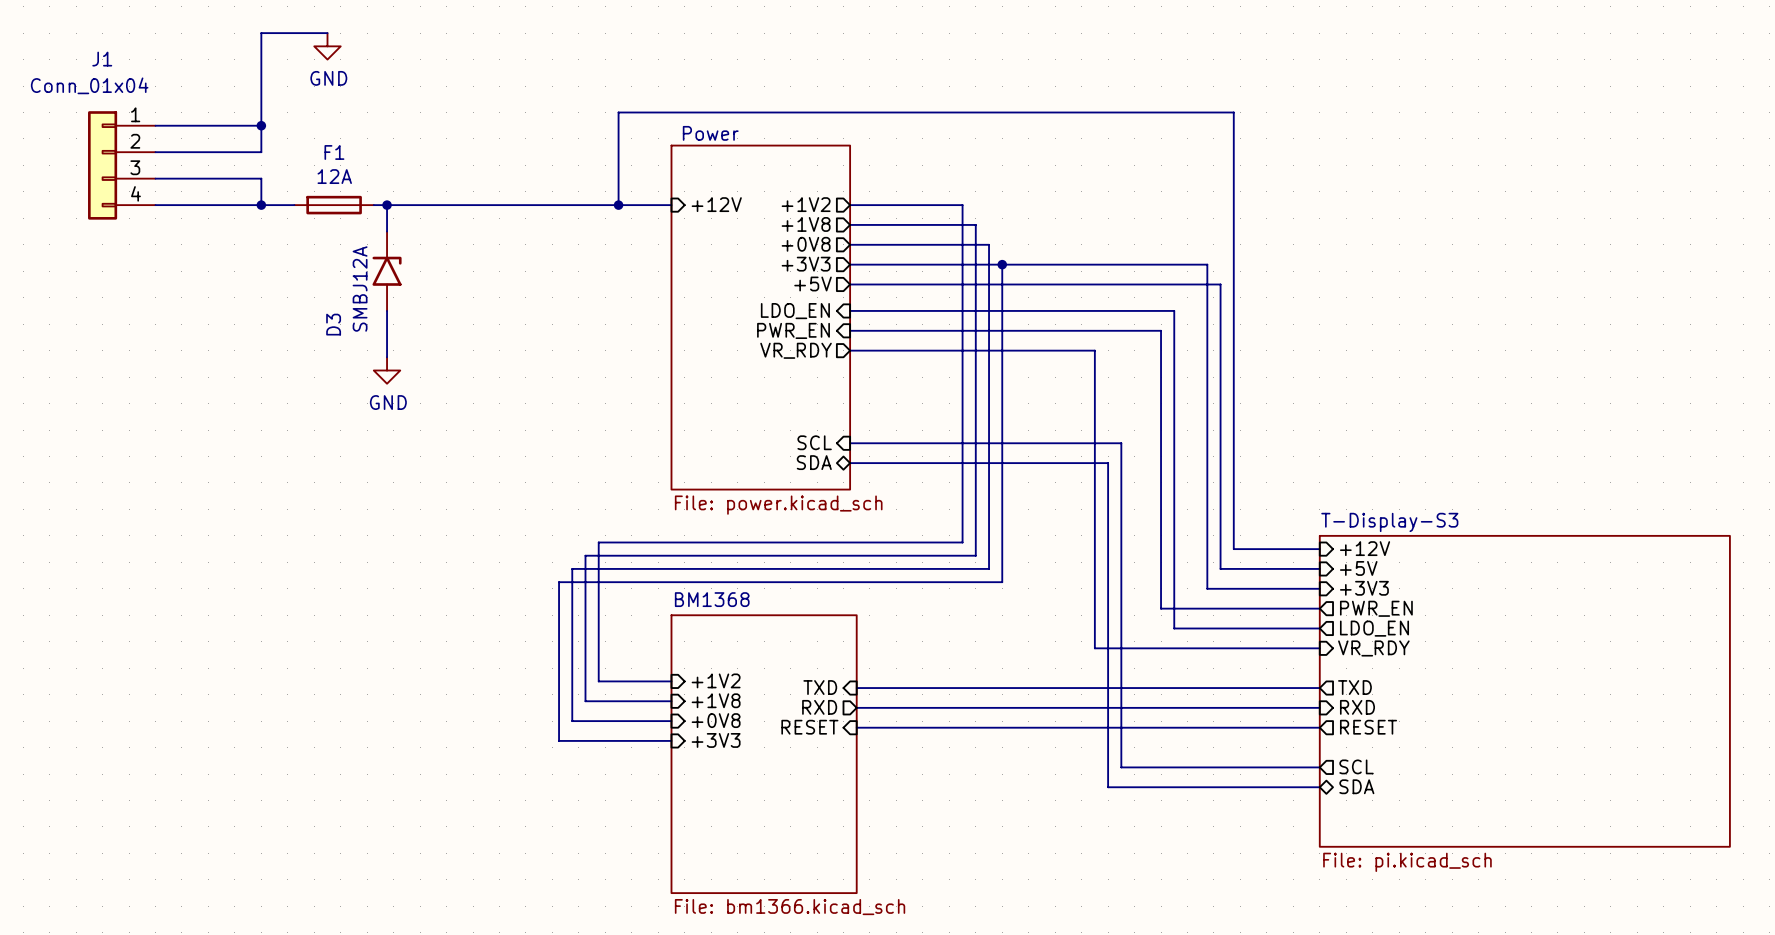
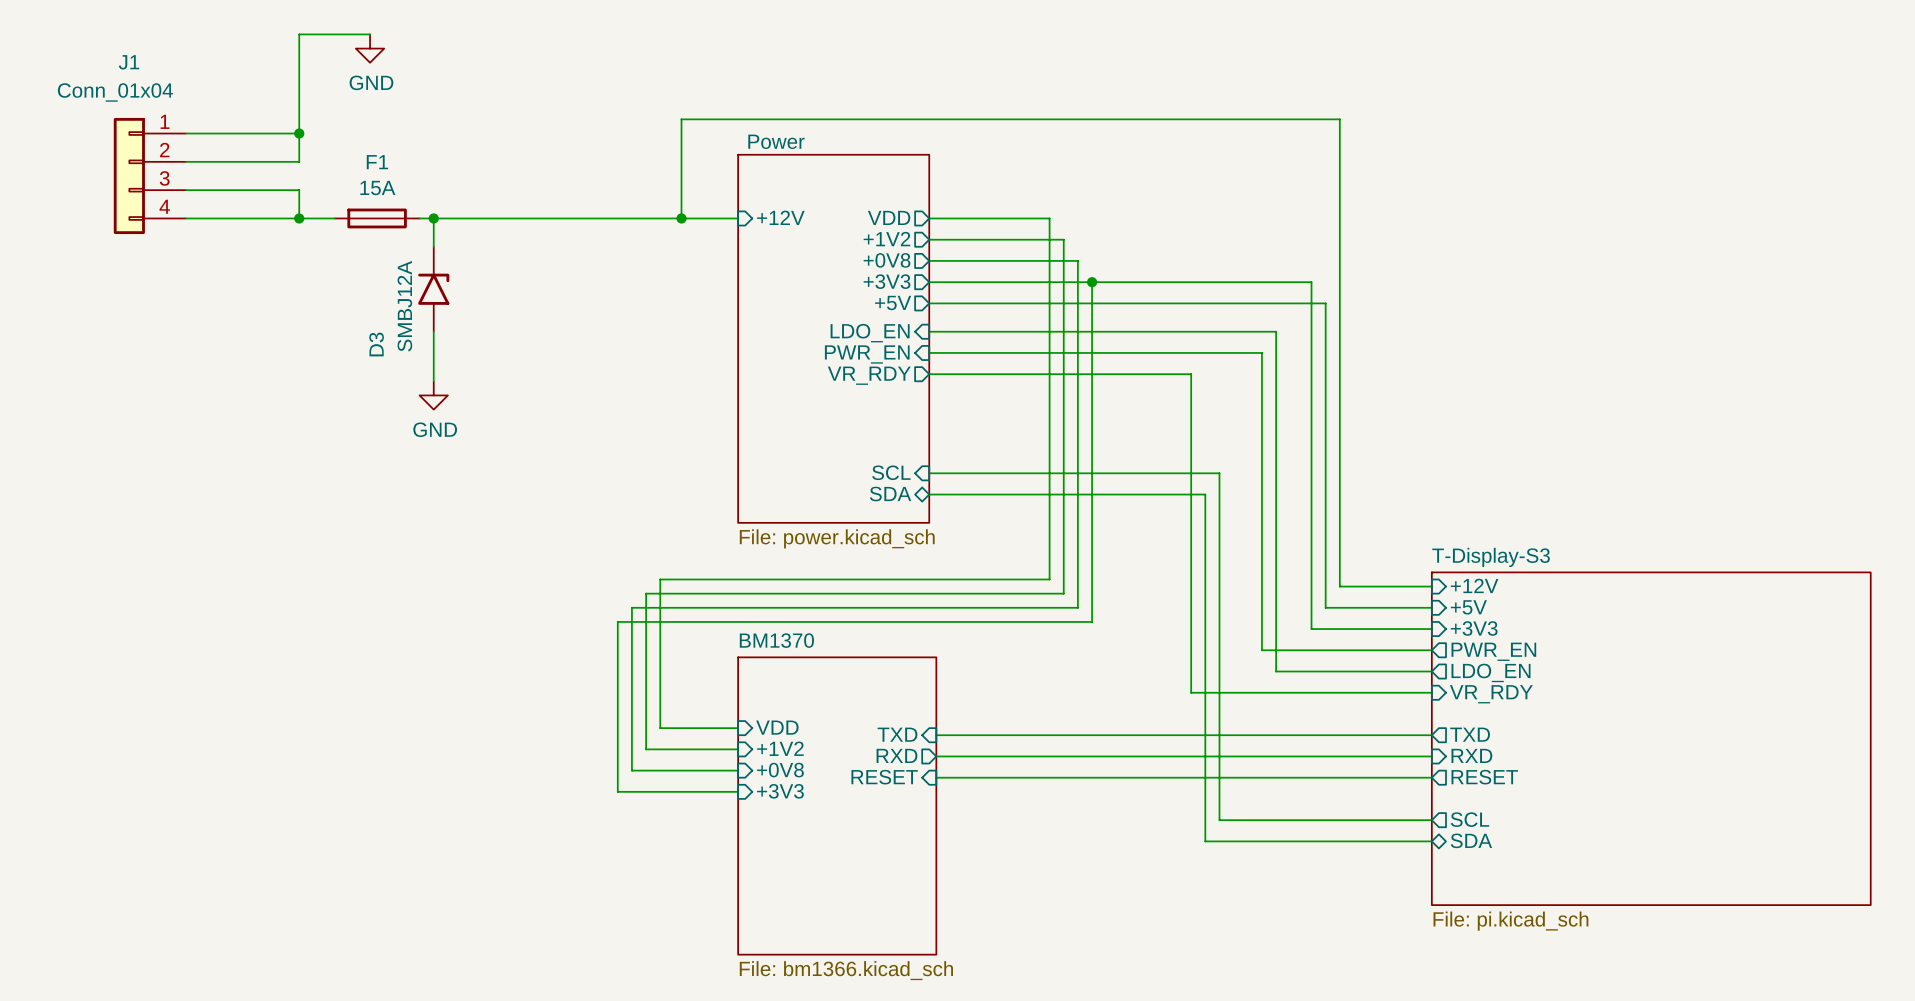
F1 value: 12A (334, 176) -> 15A (377, 188)
sheet pin: +1V2 (806, 204) -> VDD (889, 217)
sheet pin: +1V8 (806, 224) -> +1V2 (886, 239)
sheet BM1368 name: BM1368 (712, 599) -> BM1370 (776, 640)
sheet pin: +1V2 (716, 680) -> VDD (777, 727)
sheet pin: +1V8 (716, 700) -> +1V2 (780, 748)

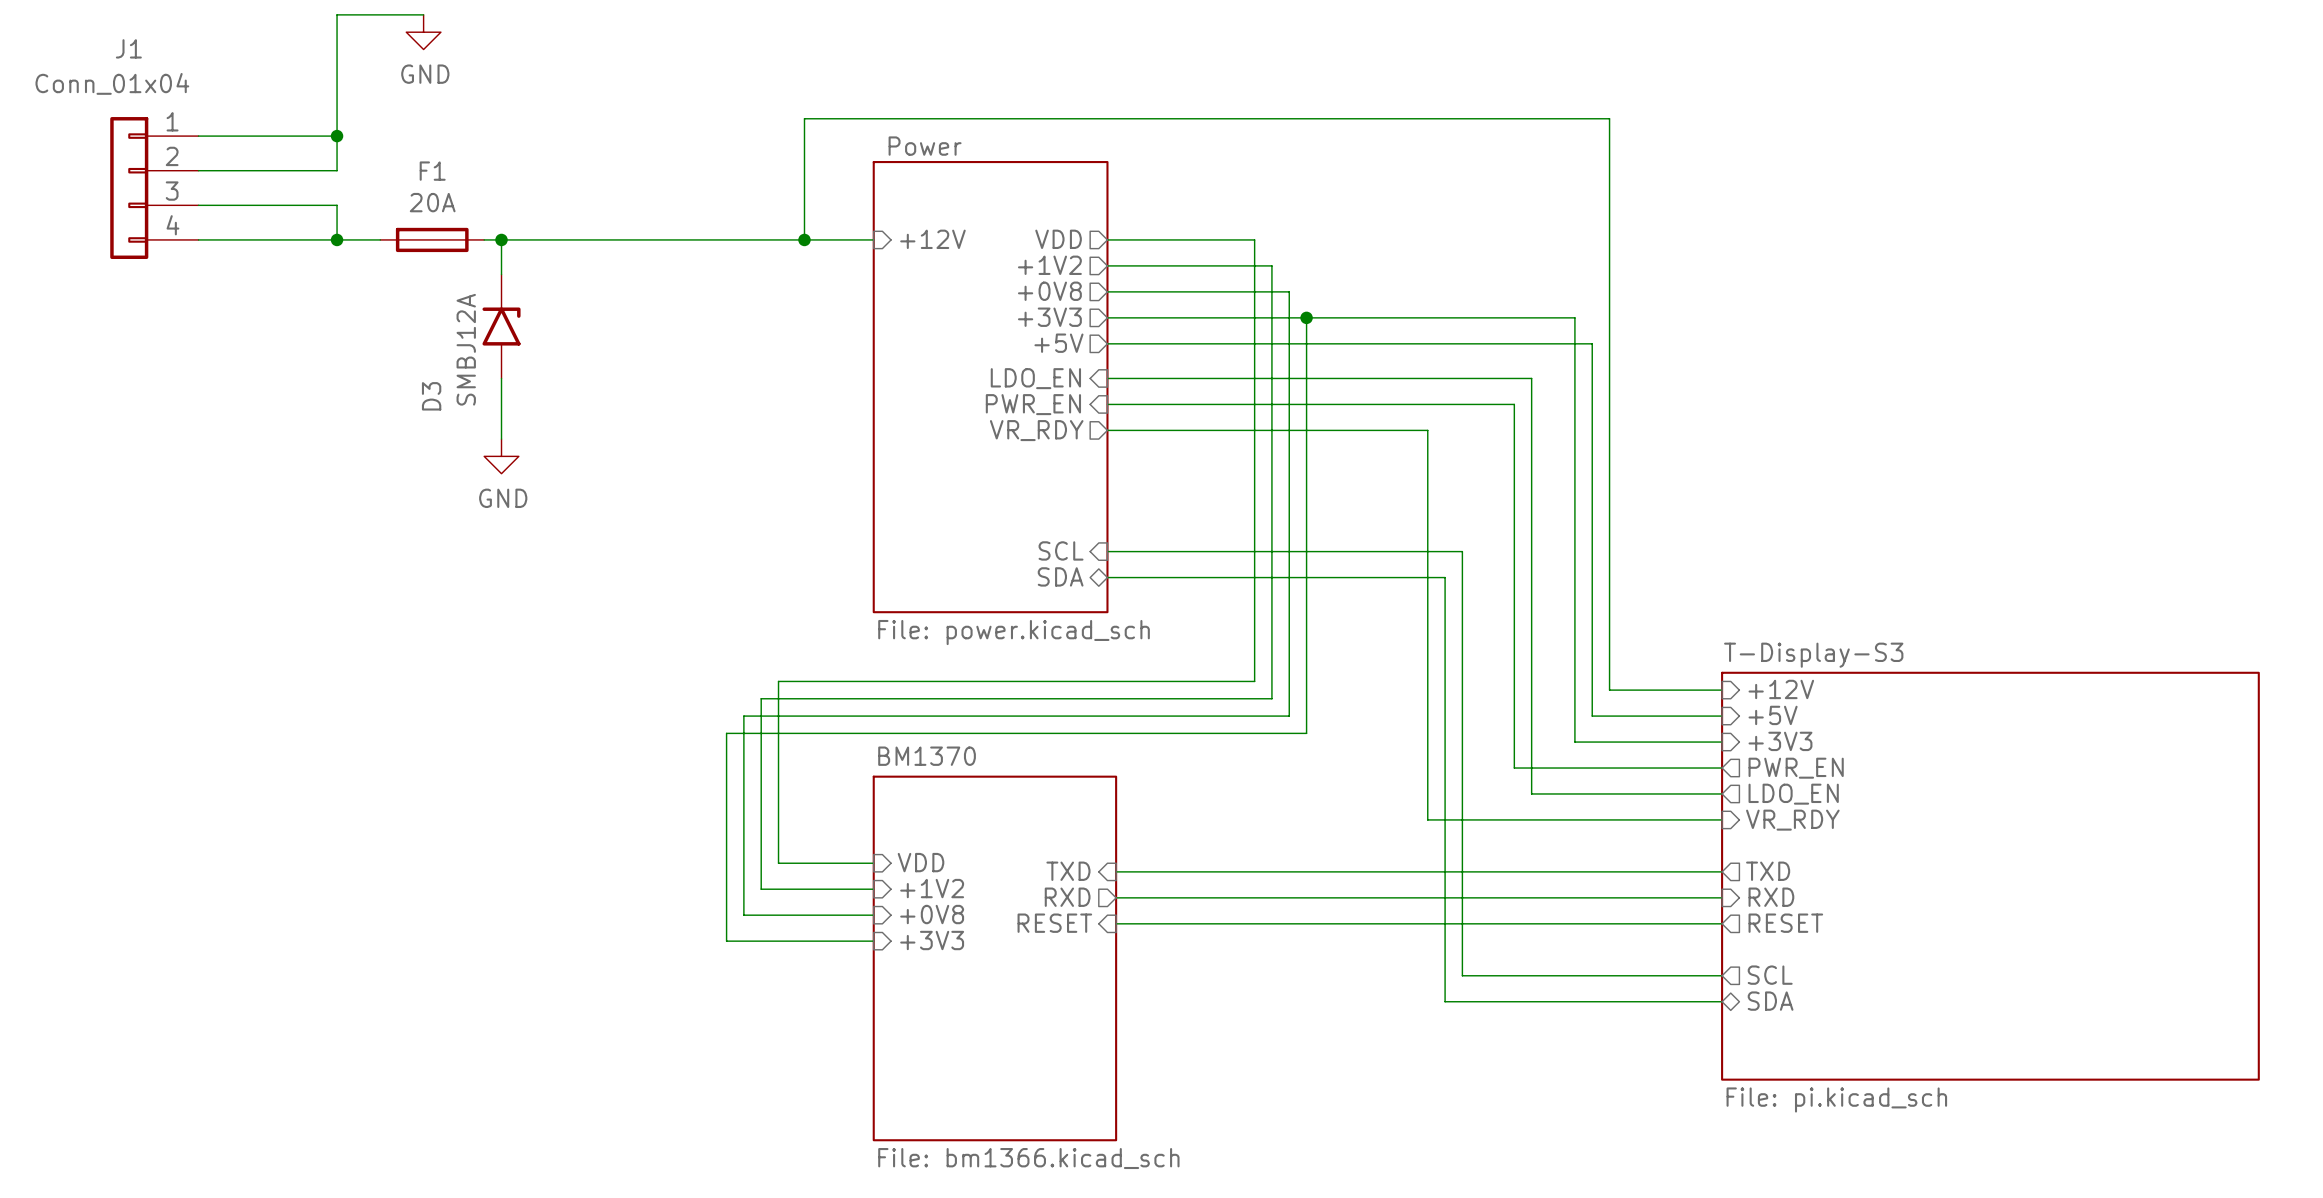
F1 value: 15A (377, 188) -> 20A (432, 202)

